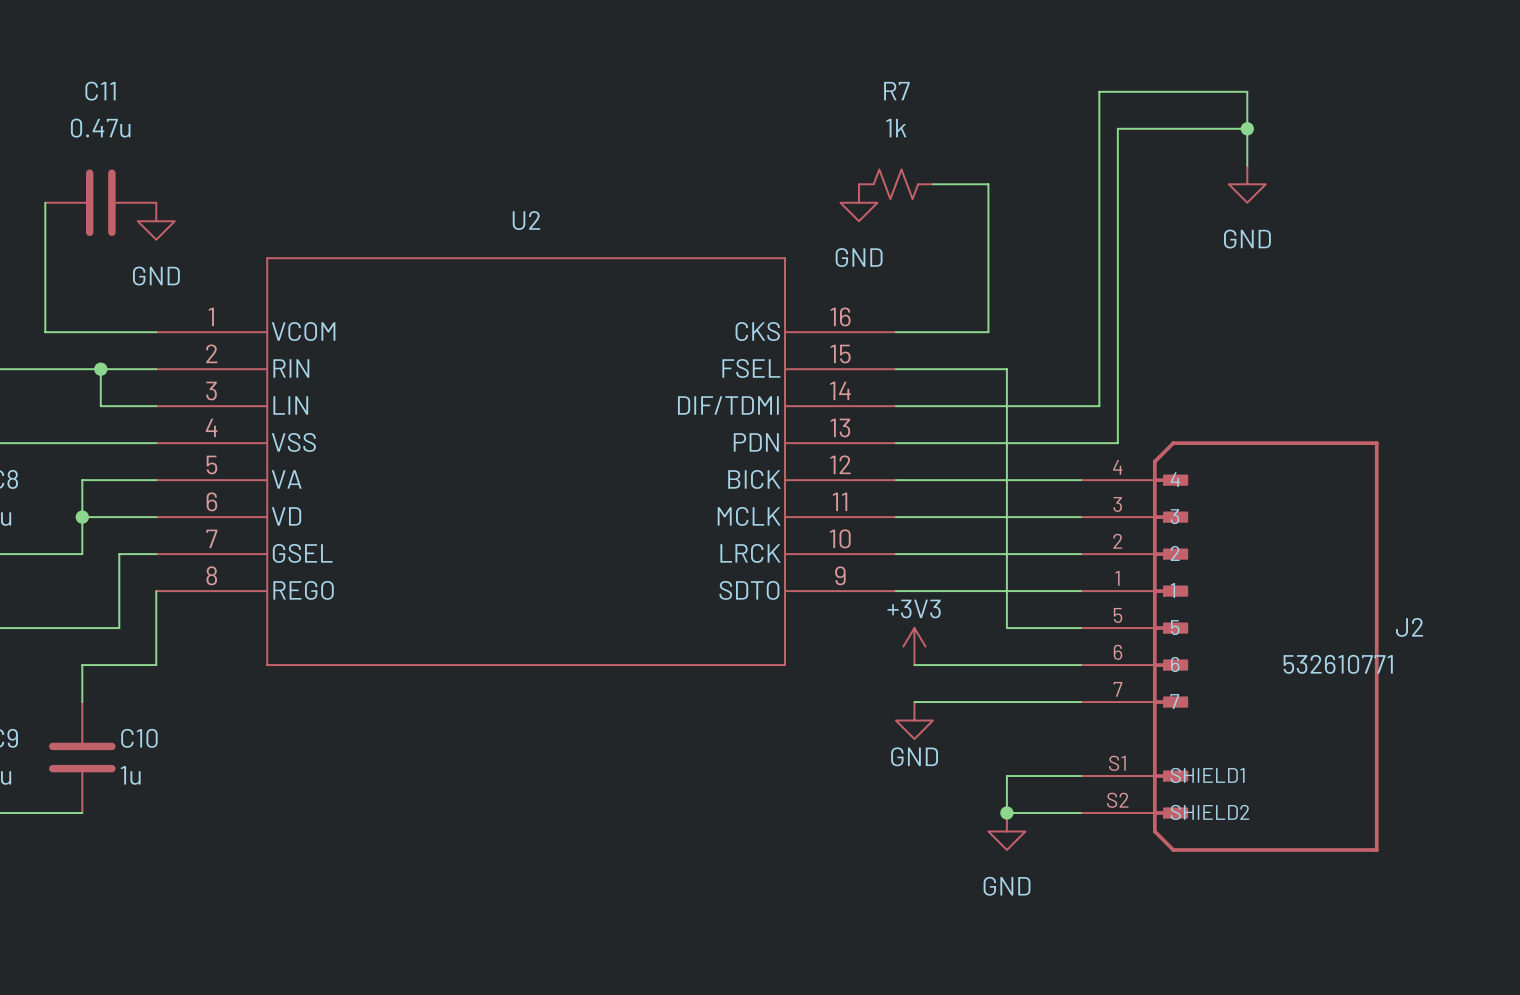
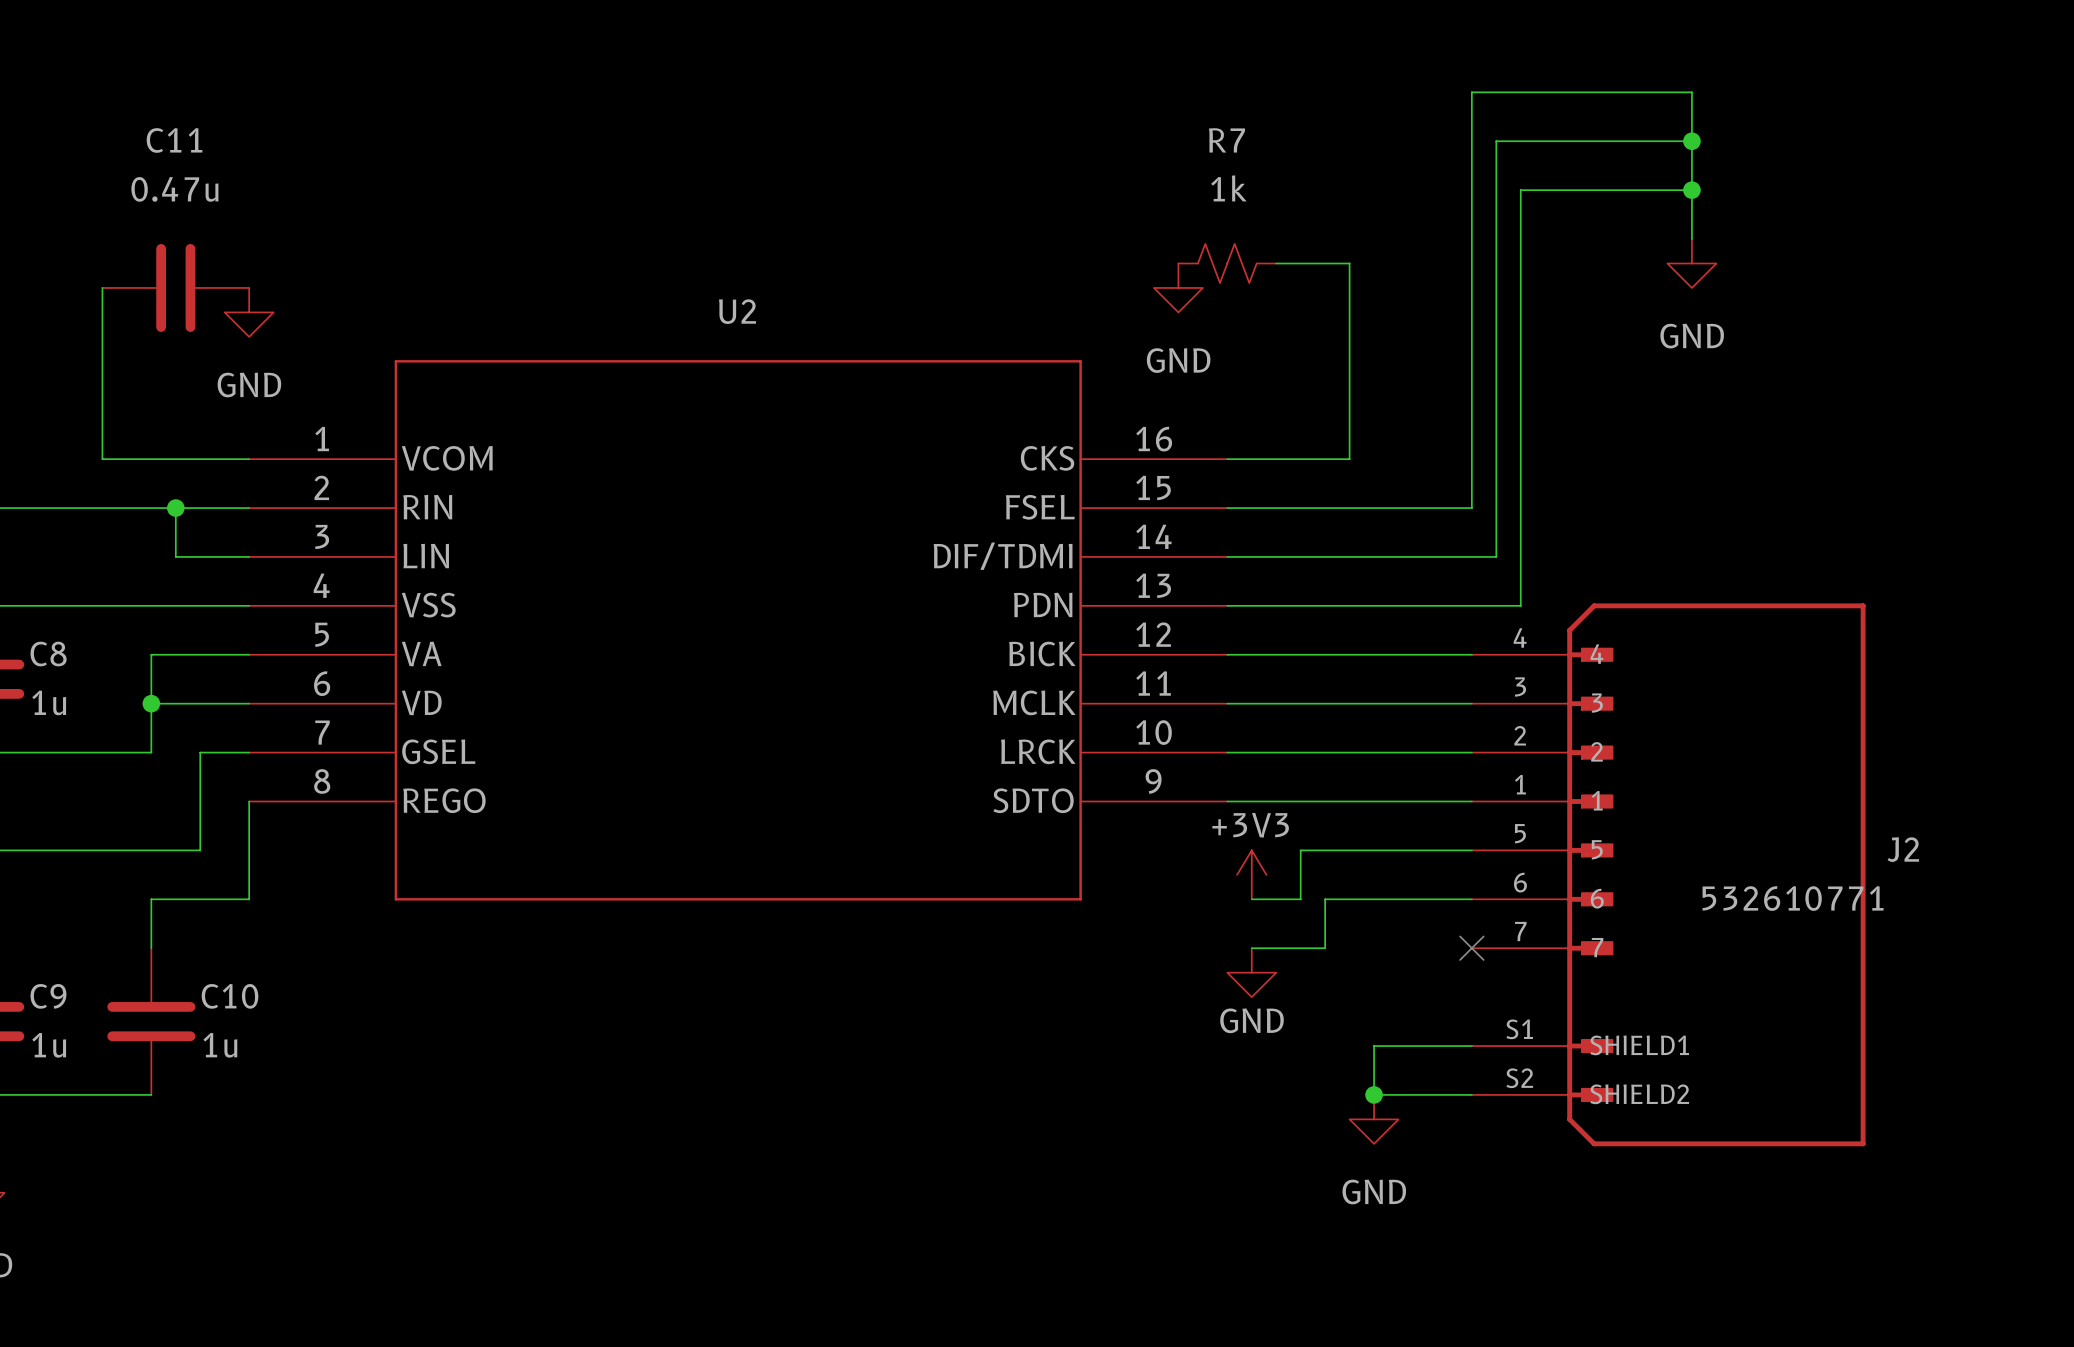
wire: none -> (1691, 141) (1691, 92) (1471, 92) (1471, 508) (1374, 508)
junction: none -> (1691, 141)
wire: (1006, 369) (1006, 628) -> (1300, 899) (1300, 850) (1374, 850)
wire: (951, 665) (969, 665) -> (1325, 948) (1325, 899)
wire: (969, 702) (1080, 702) -> none
no-connect mark: none -> (1471, 948)

